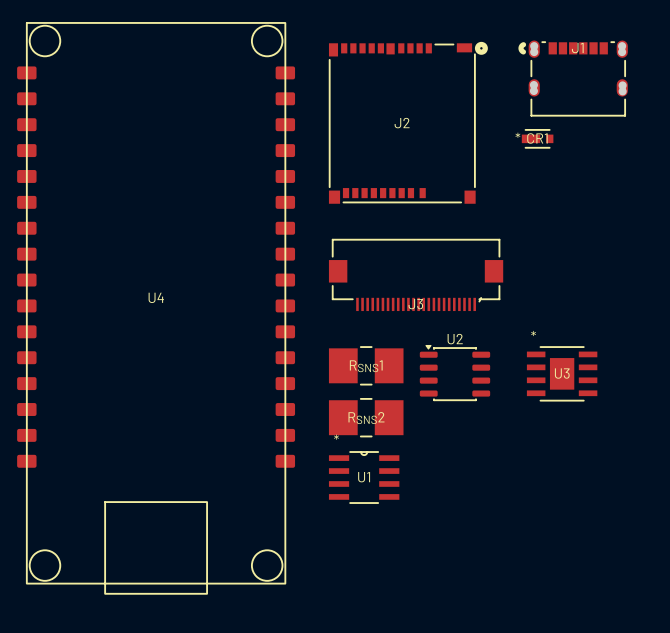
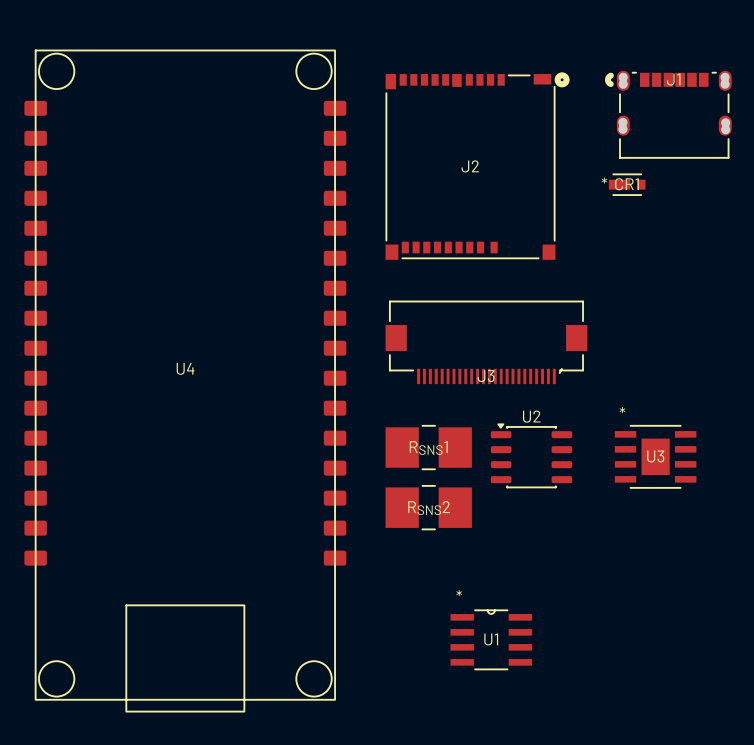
U1 position: (364, 477) -> (491, 639)

